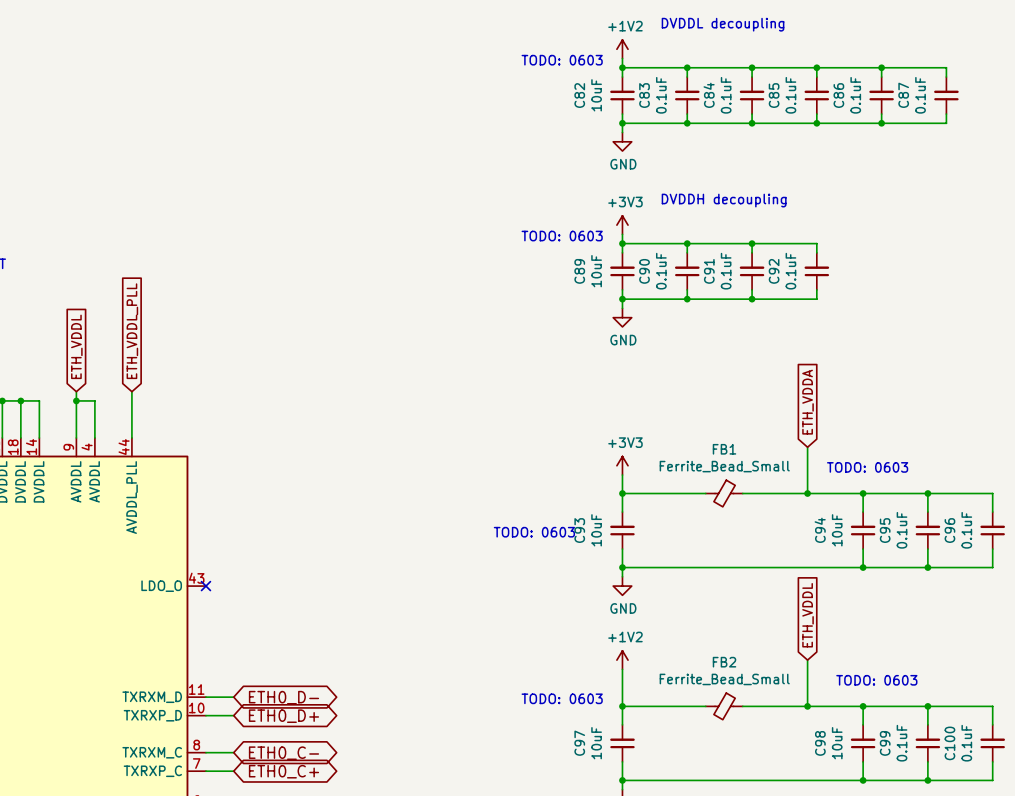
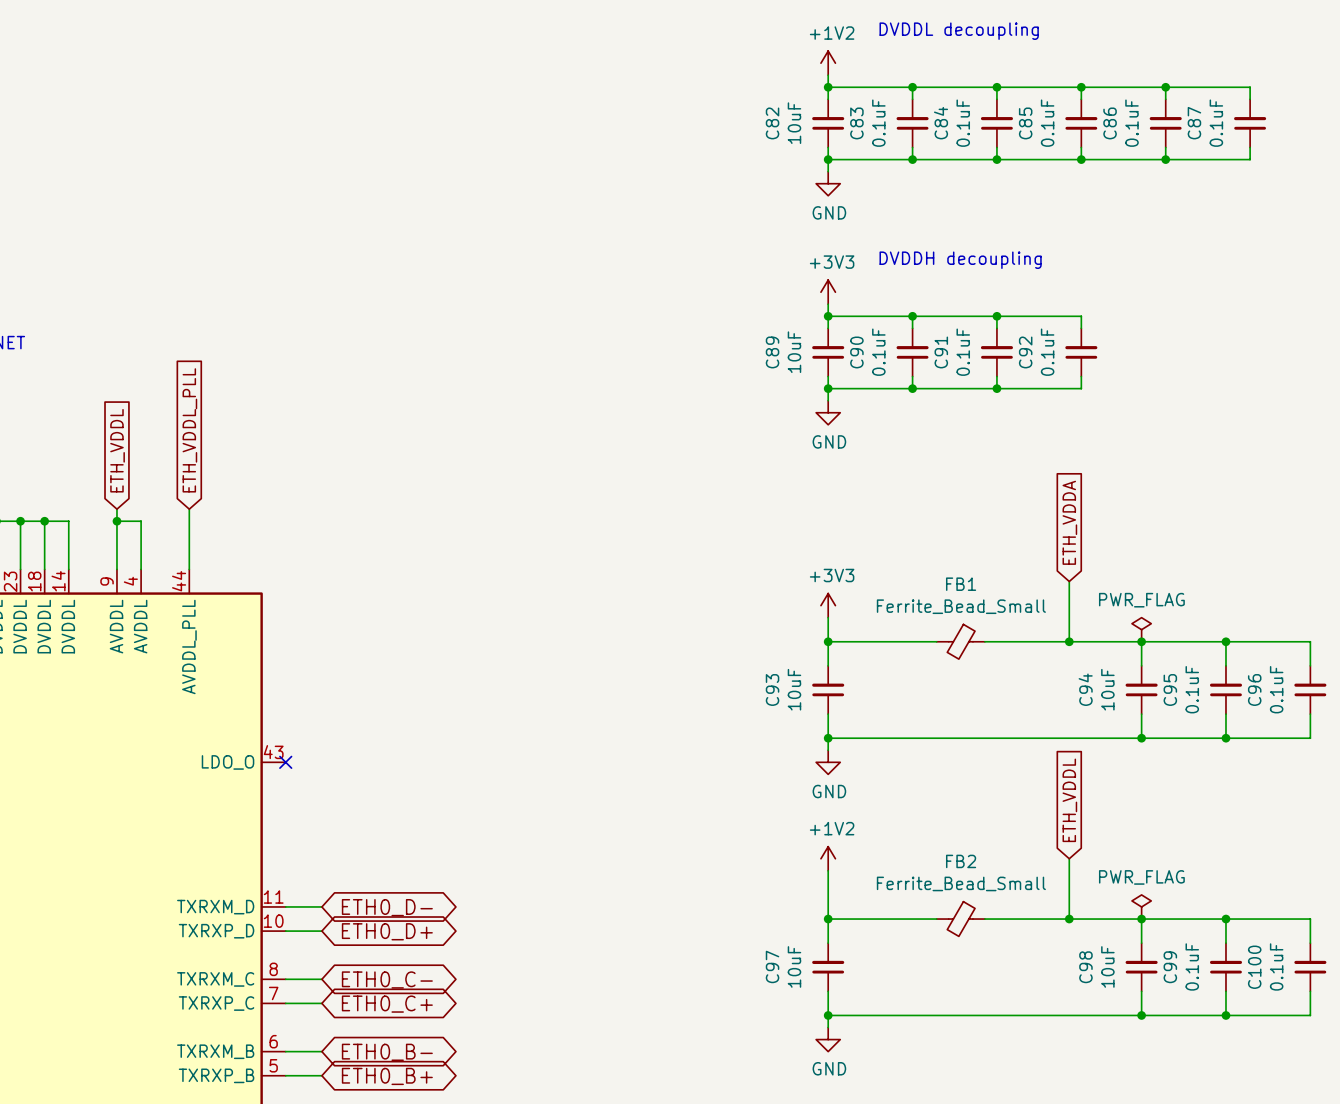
text: TODO: 0603 (562, 60) -> none
text: TODO: 0603 (562, 236) -> none
text: TODO: 0603 (867, 467) -> none
power symbol: none -> PWR_FLAG (1141, 629)
text: TODO: 0603 (534, 532) -> none
text: TODO: 0603 (876, 680) -> none
power symbol: none -> PWR_FLAG (1141, 906)
text: TODO: 0603 (562, 698) -> none

